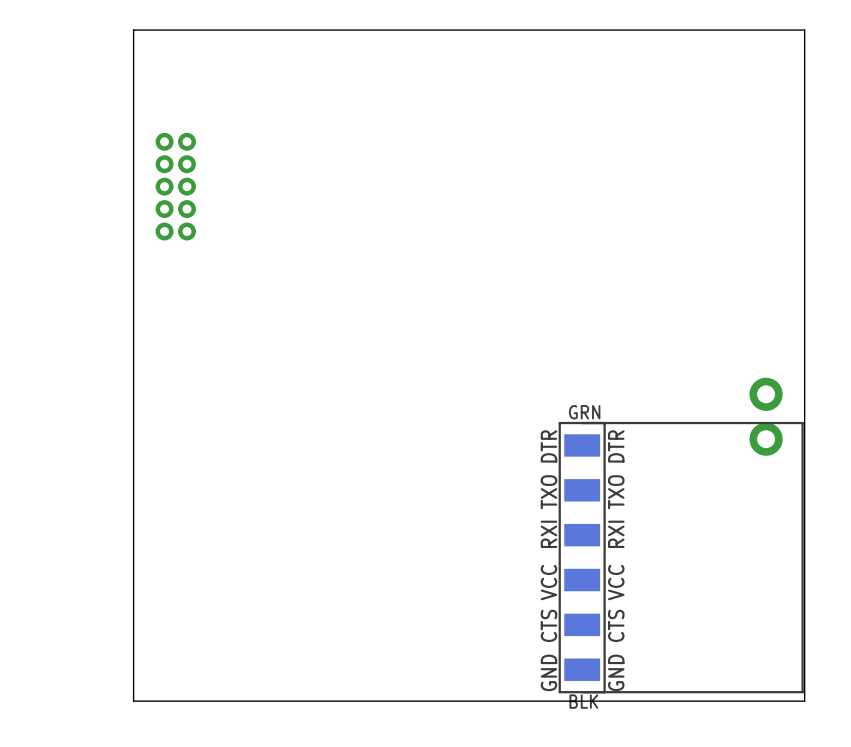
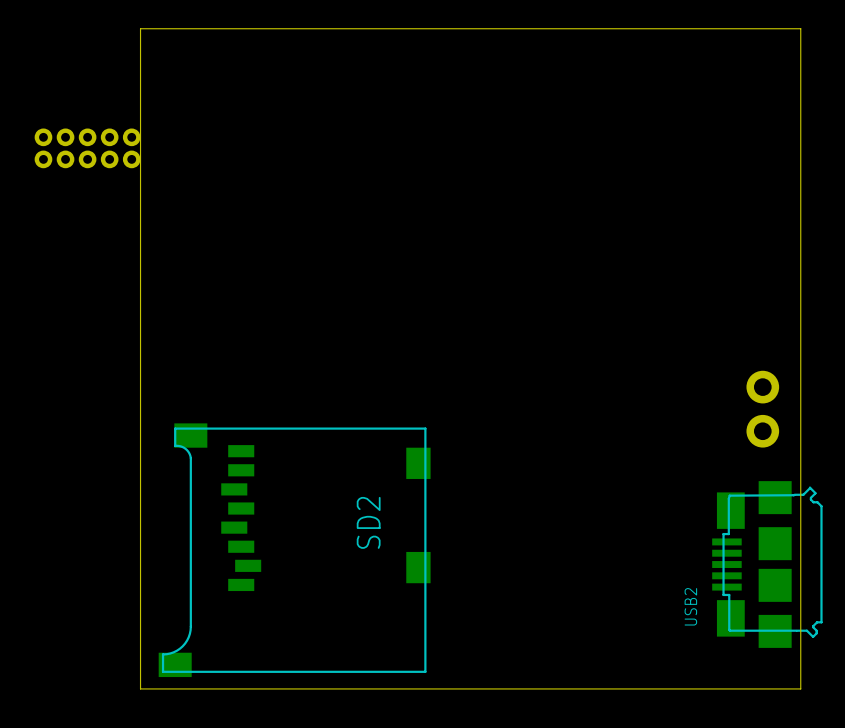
part rotation: 0° (175, 186) -> 90° clockwise (87, 148)
part position: (175, 186) -> (87, 148)
part: (681, 557) -> none
SD2: none -> (294, 550)
USB2: none -> (767, 564)

